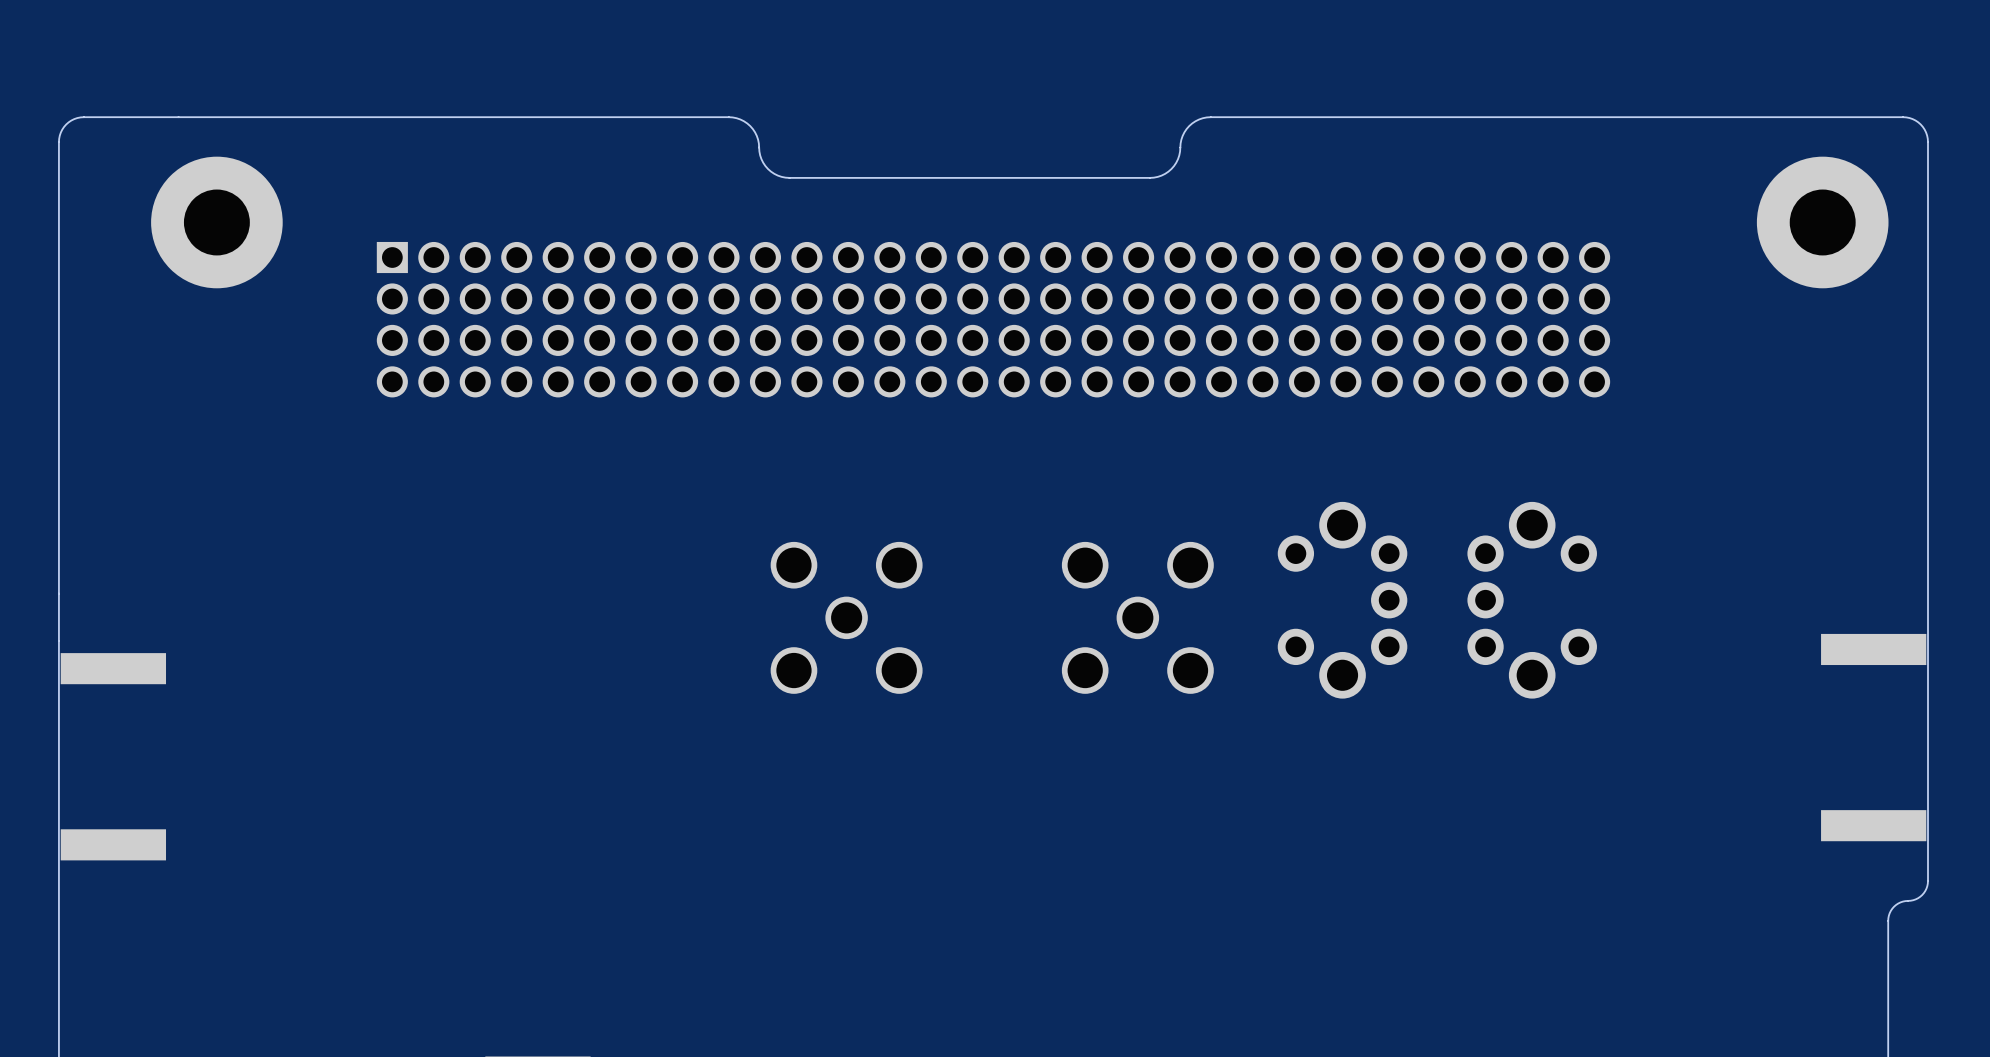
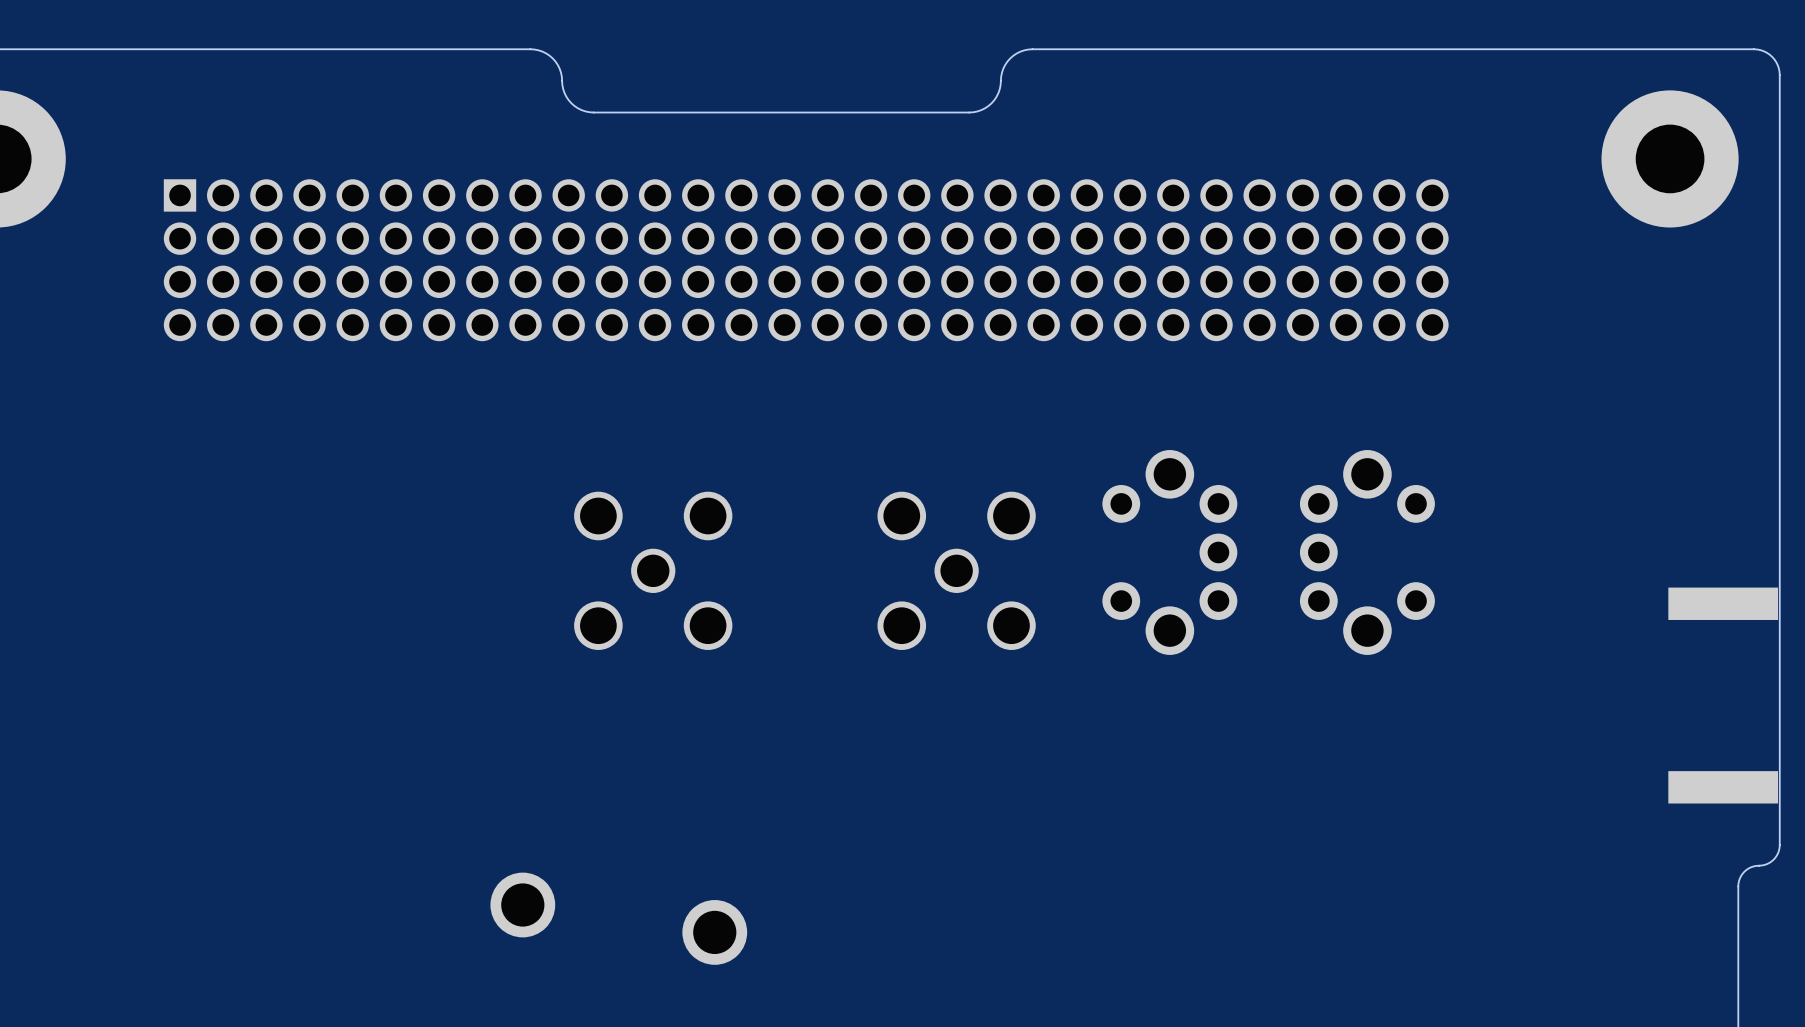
part: none -> (522, 905)
part: none -> (714, 932)

